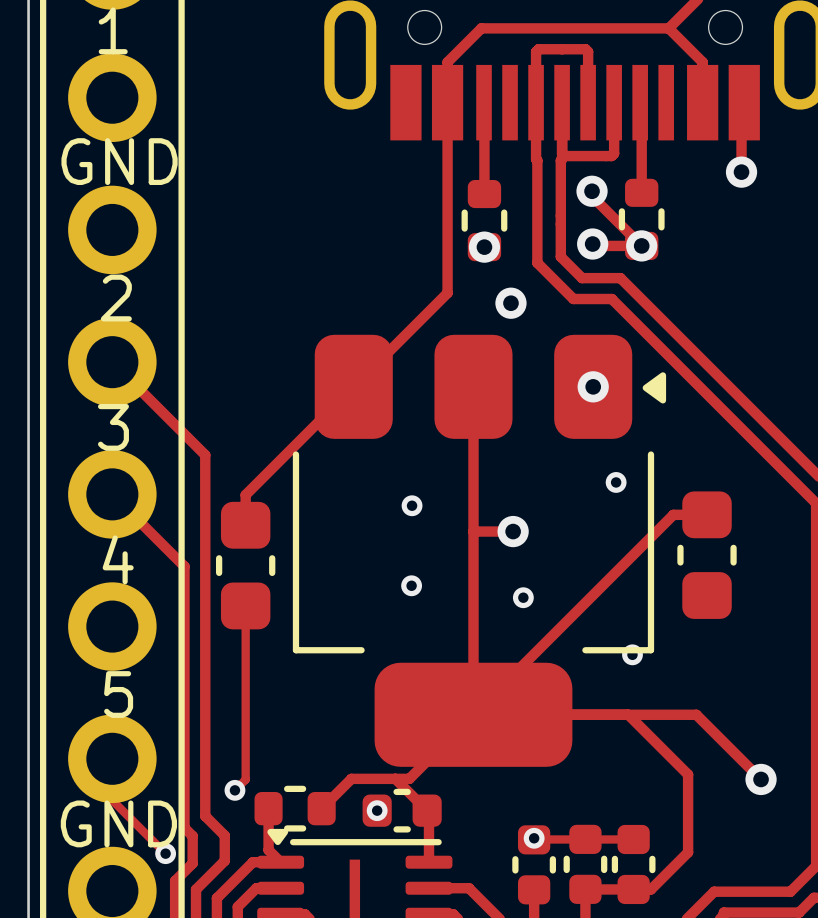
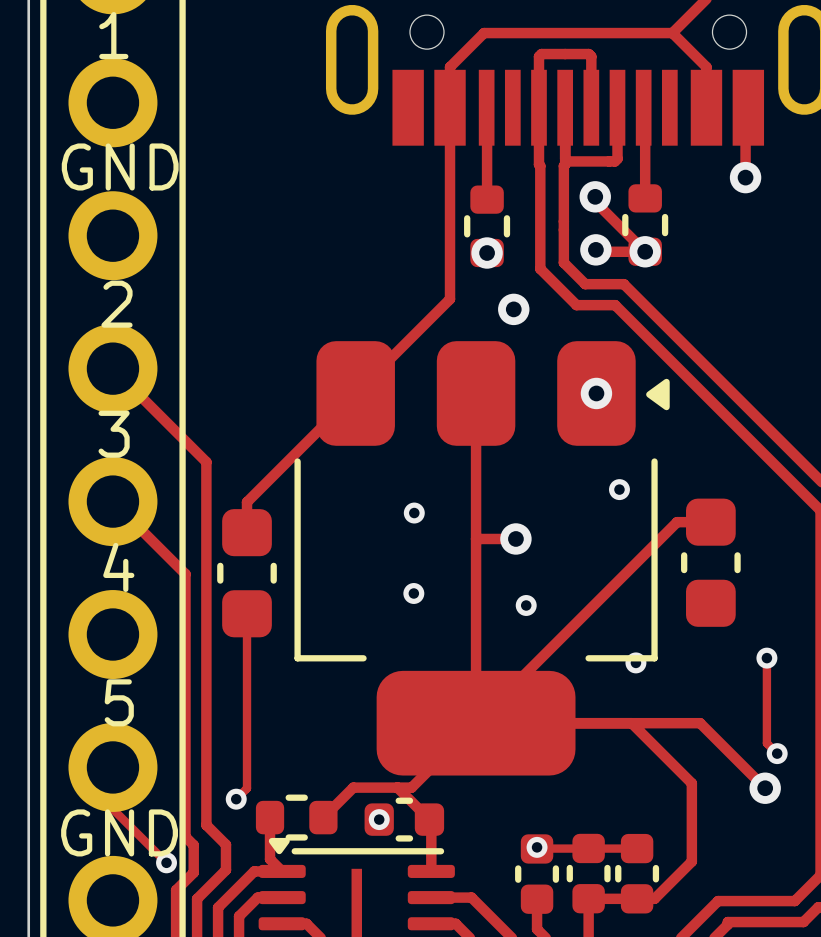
track: none -> (766, 658) (766, 743) (777, 753)
via: none -> (766, 658)
via: none -> (777, 753)

